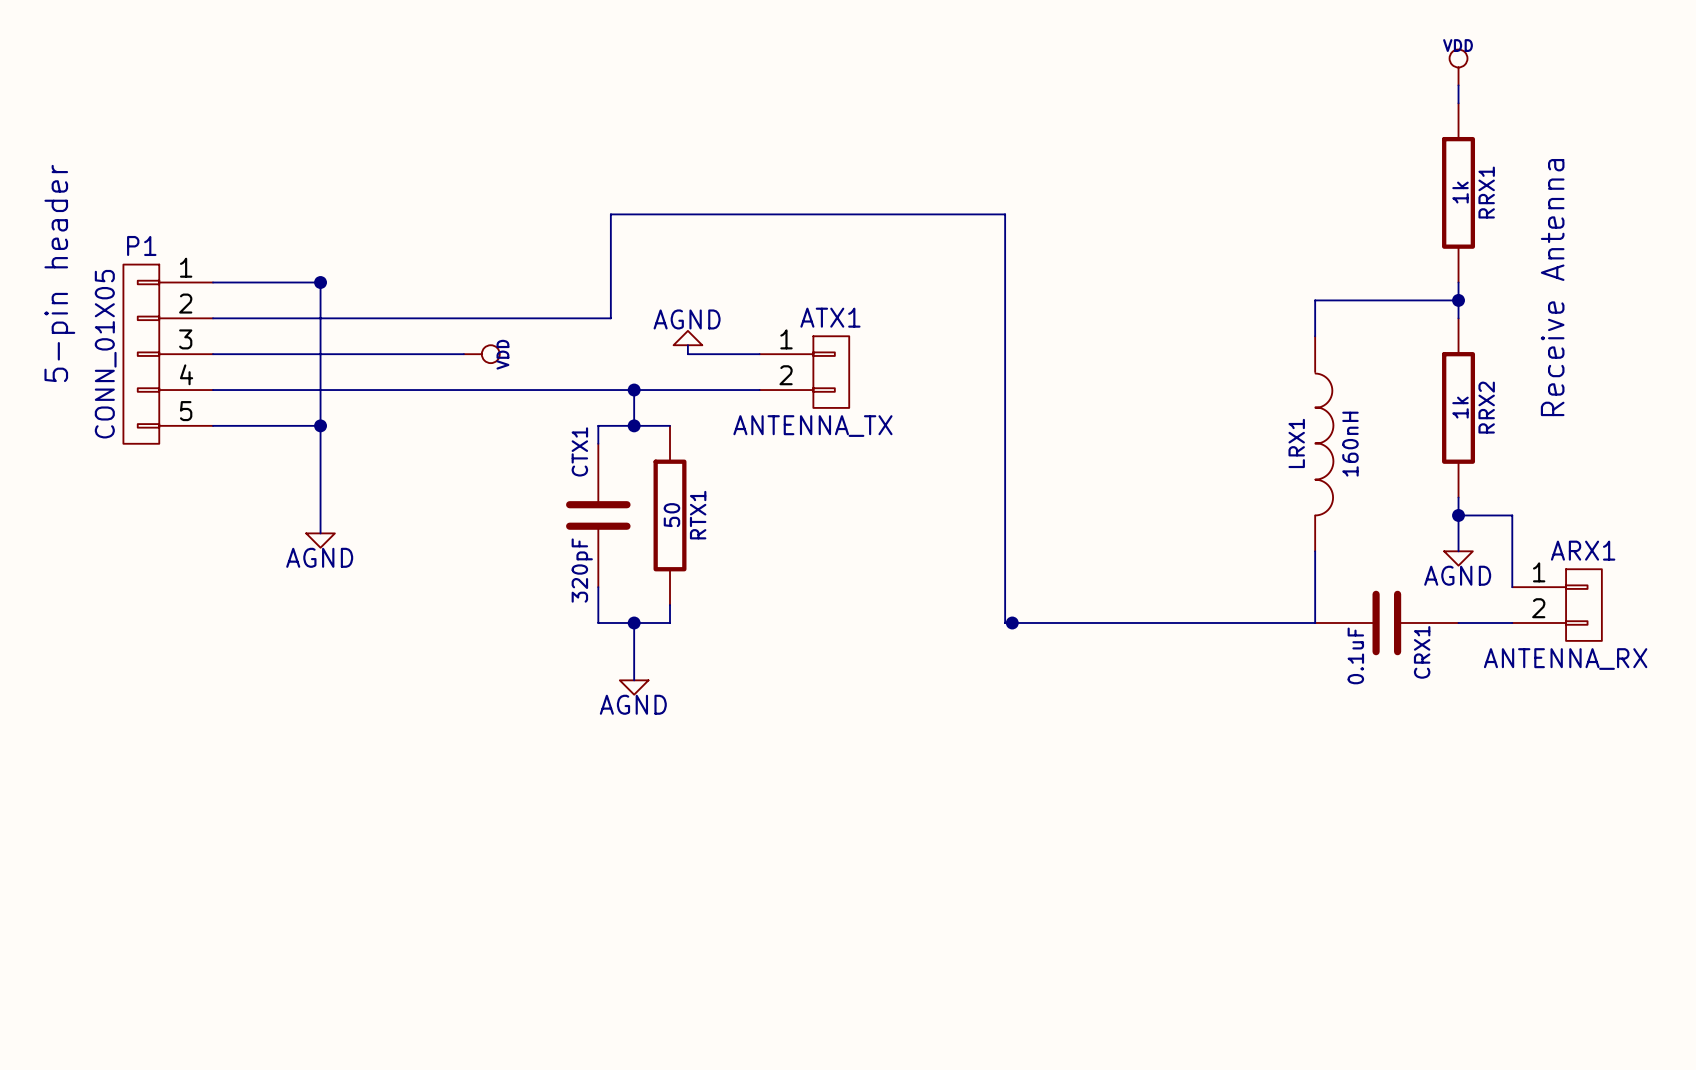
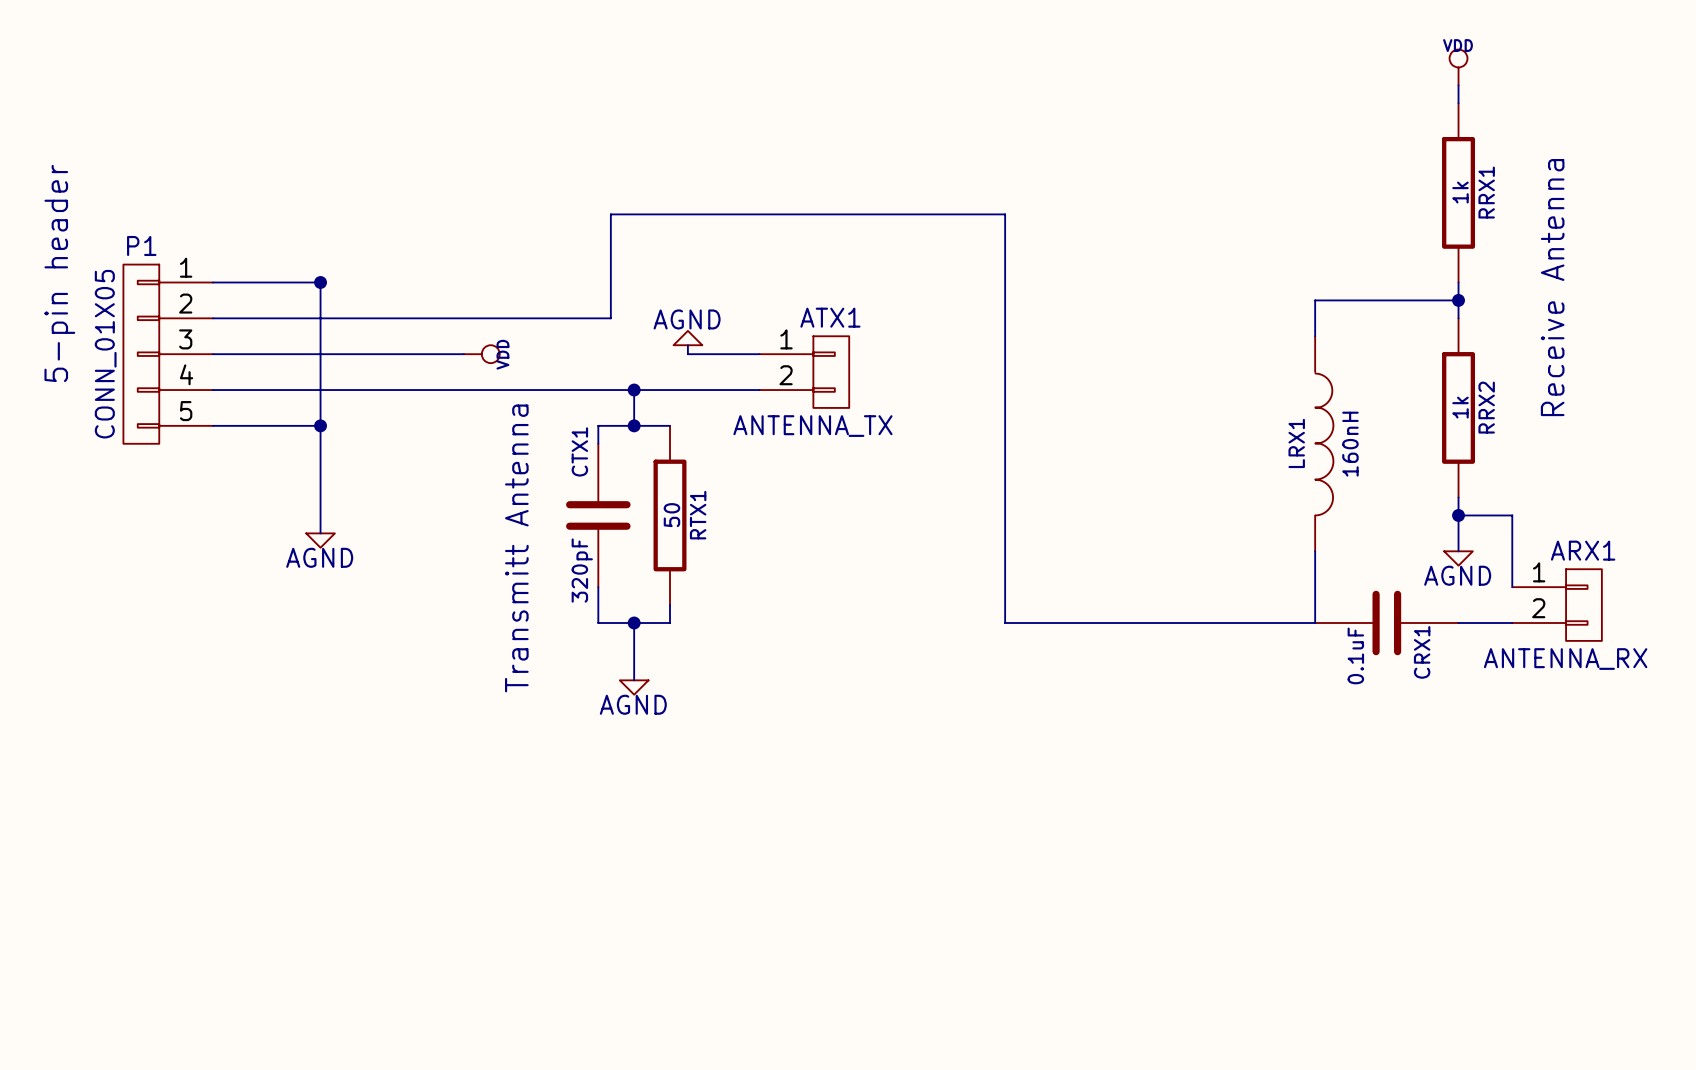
text: none -> Transmitt Antenna (516, 548)
junction: (1012, 622) -> none

